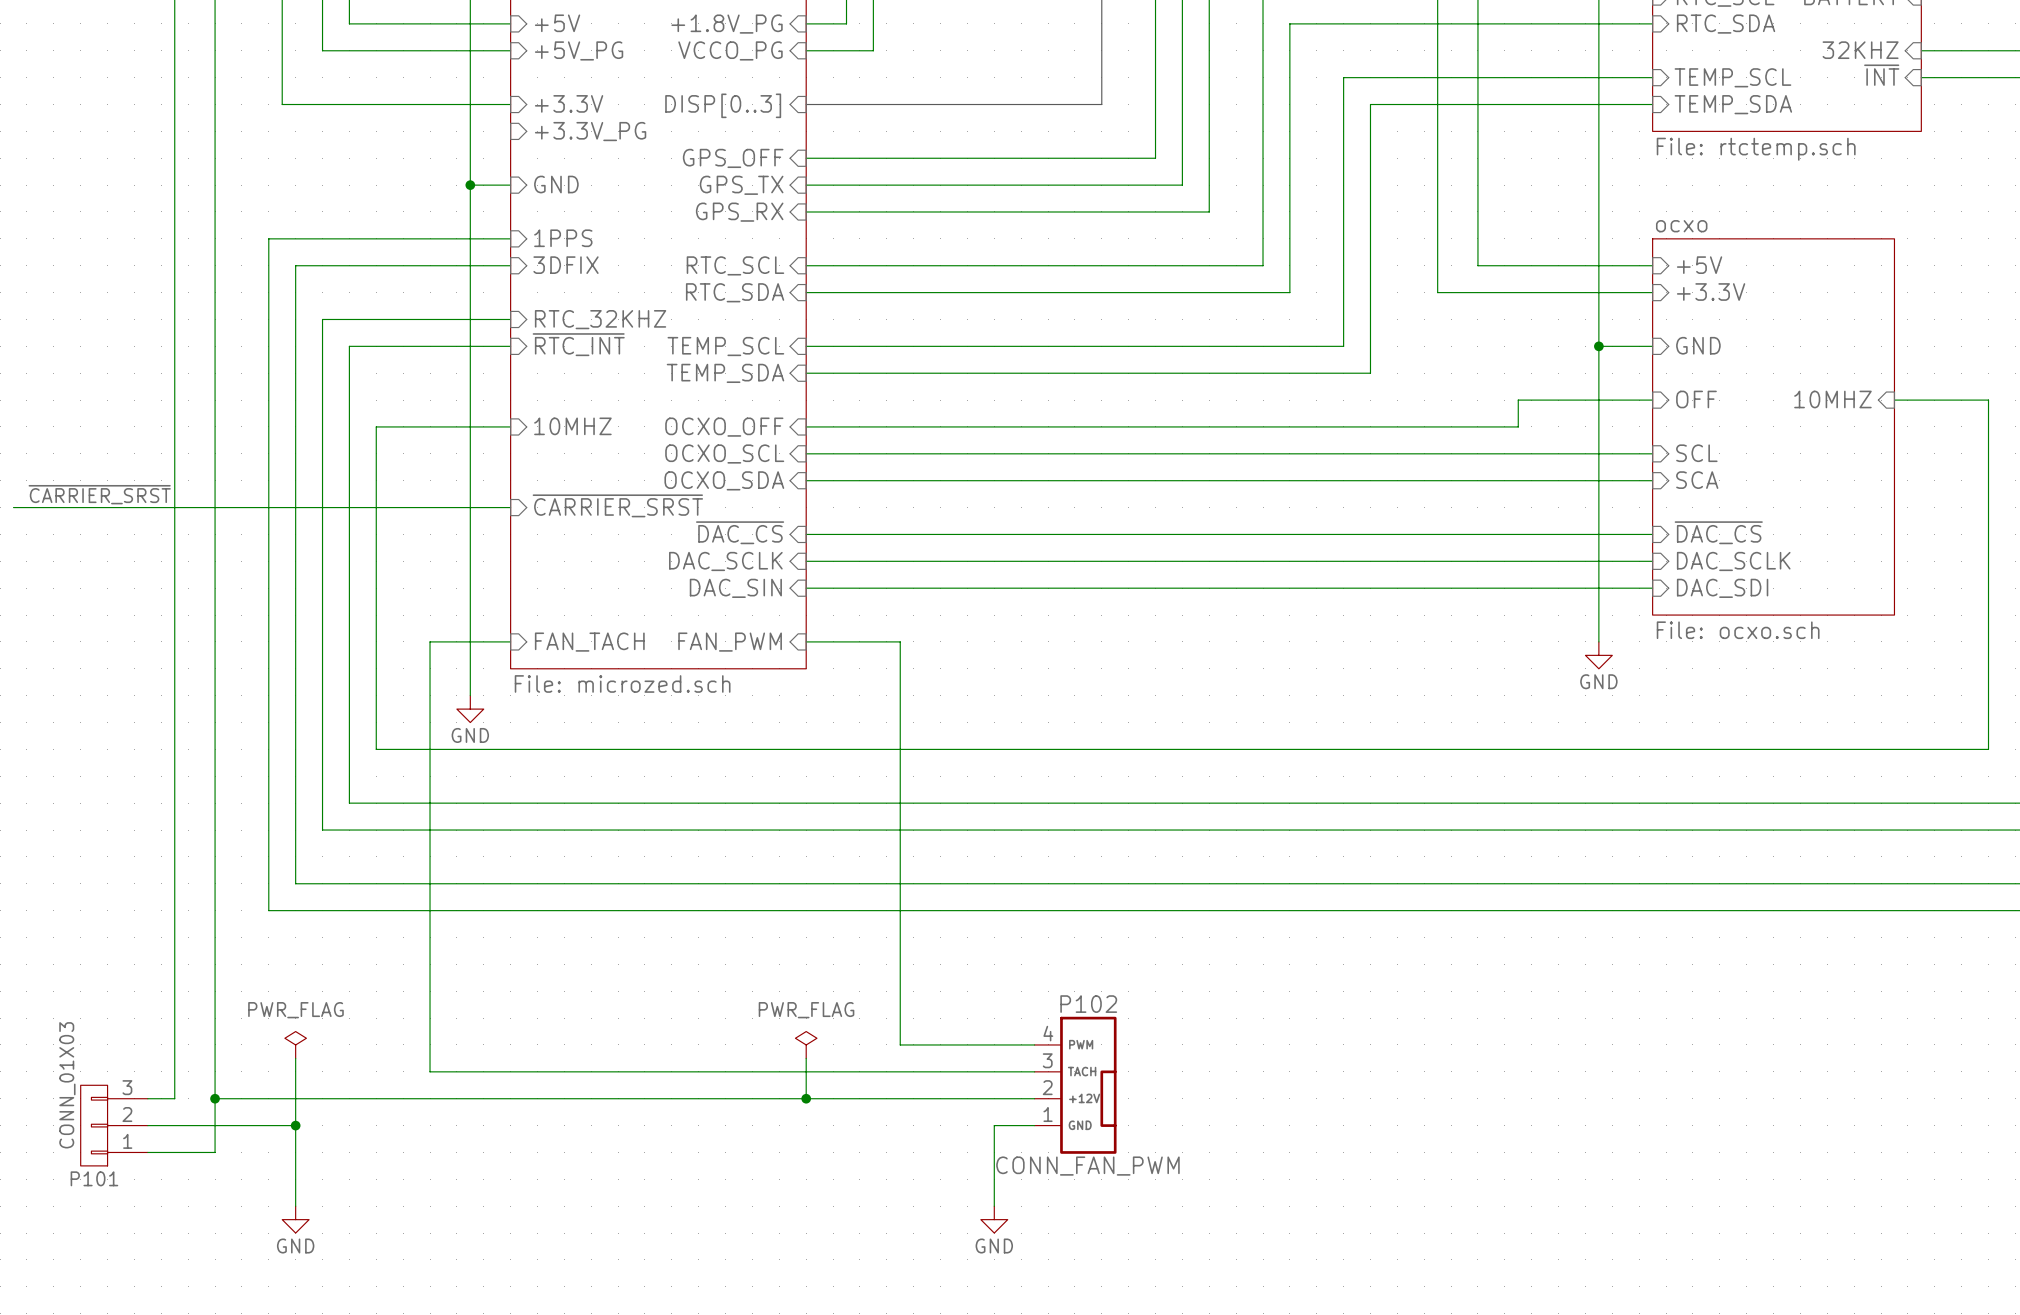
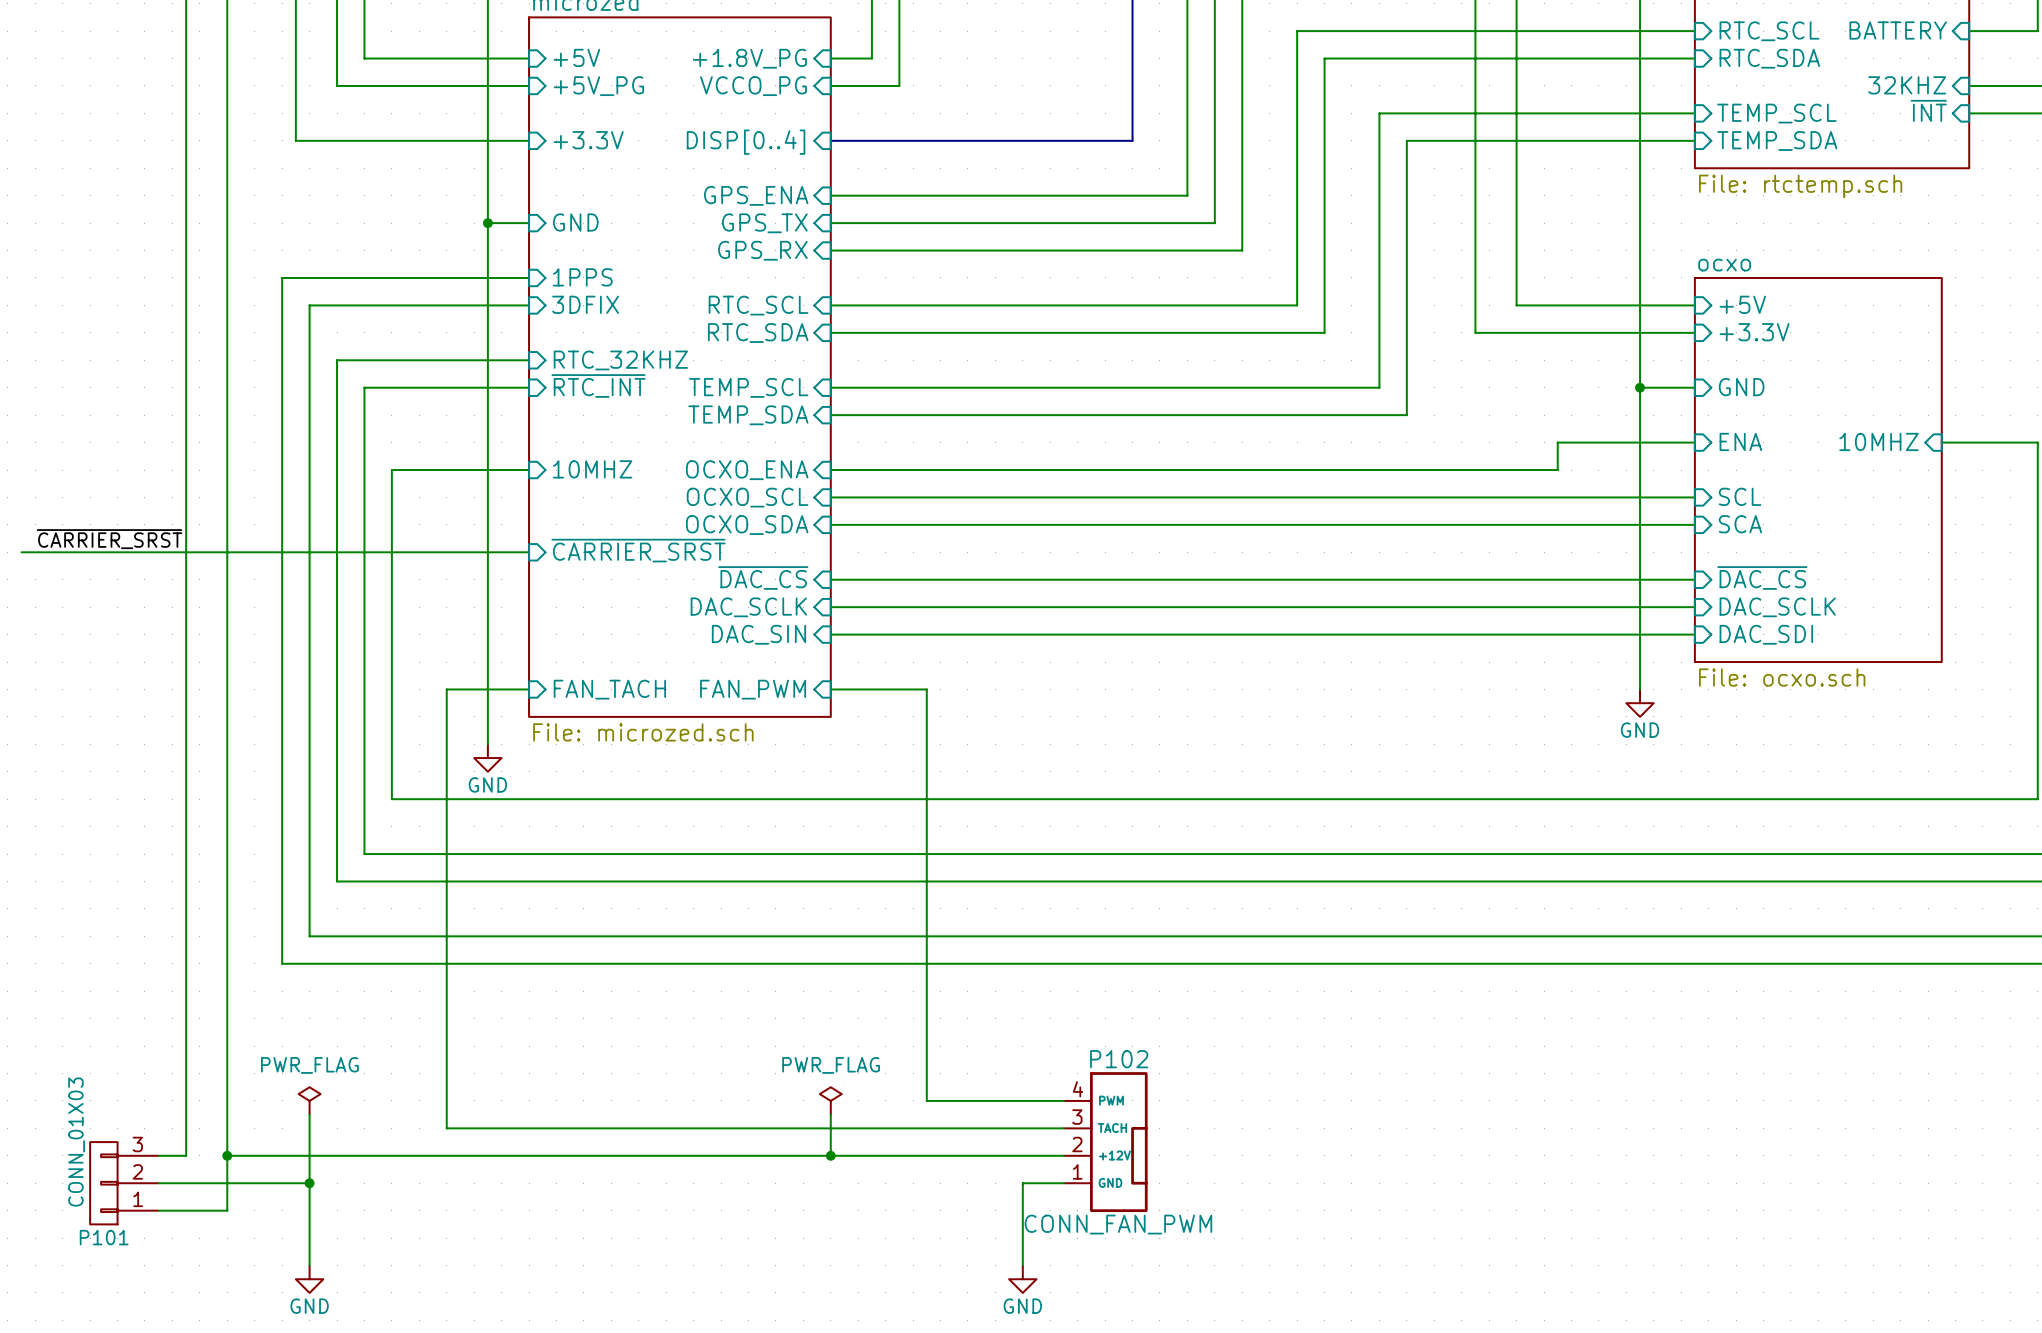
sheet pin: DISP[0..3] (723, 105) -> DISP[0..4] (746, 142)
sheet pin: +3.3V_PG (590, 131) -> none
sheet pin: GPS_OFF (733, 158) -> GPS_ENA (756, 195)
sheet pin: OFF (1696, 399) -> ENA (1740, 441)
sheet pin: OCXO_OFF (724, 427) -> OCXO_ENA (747, 470)

